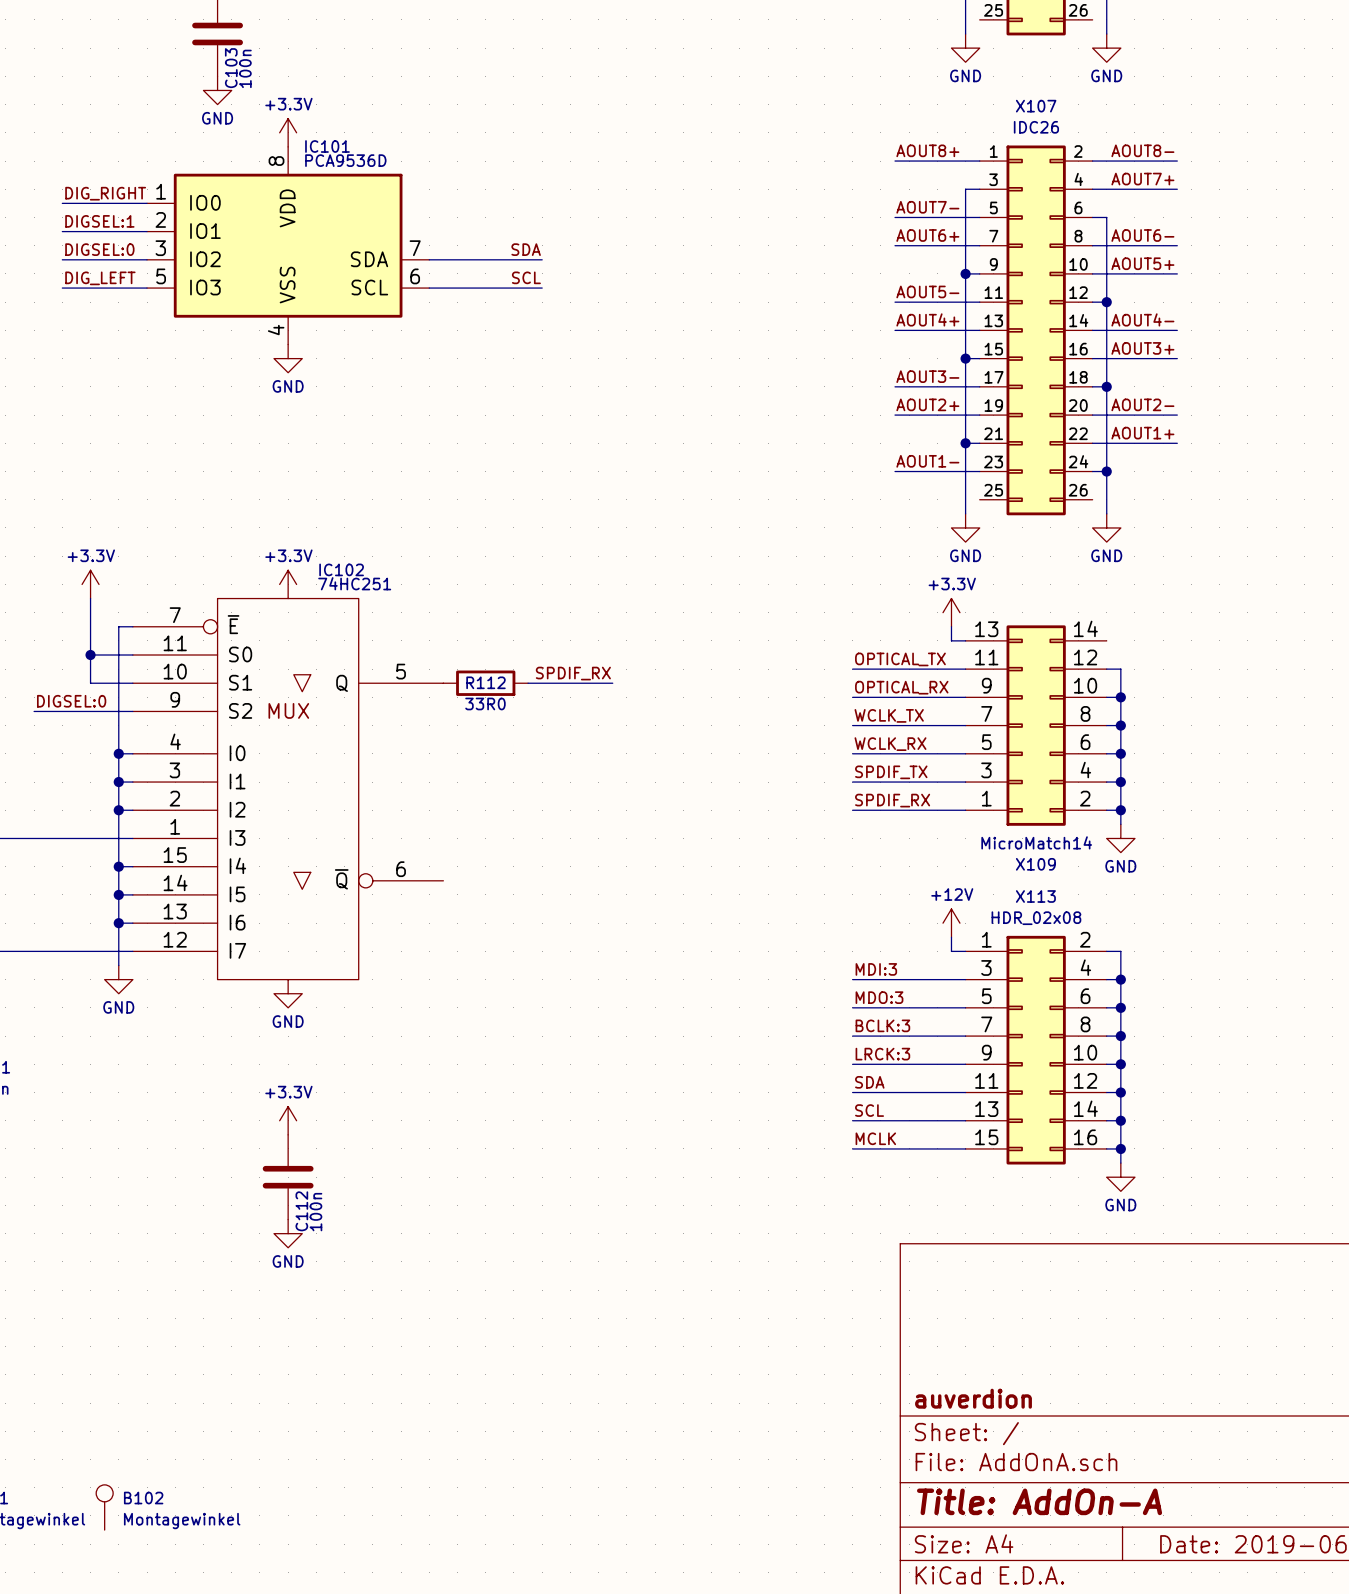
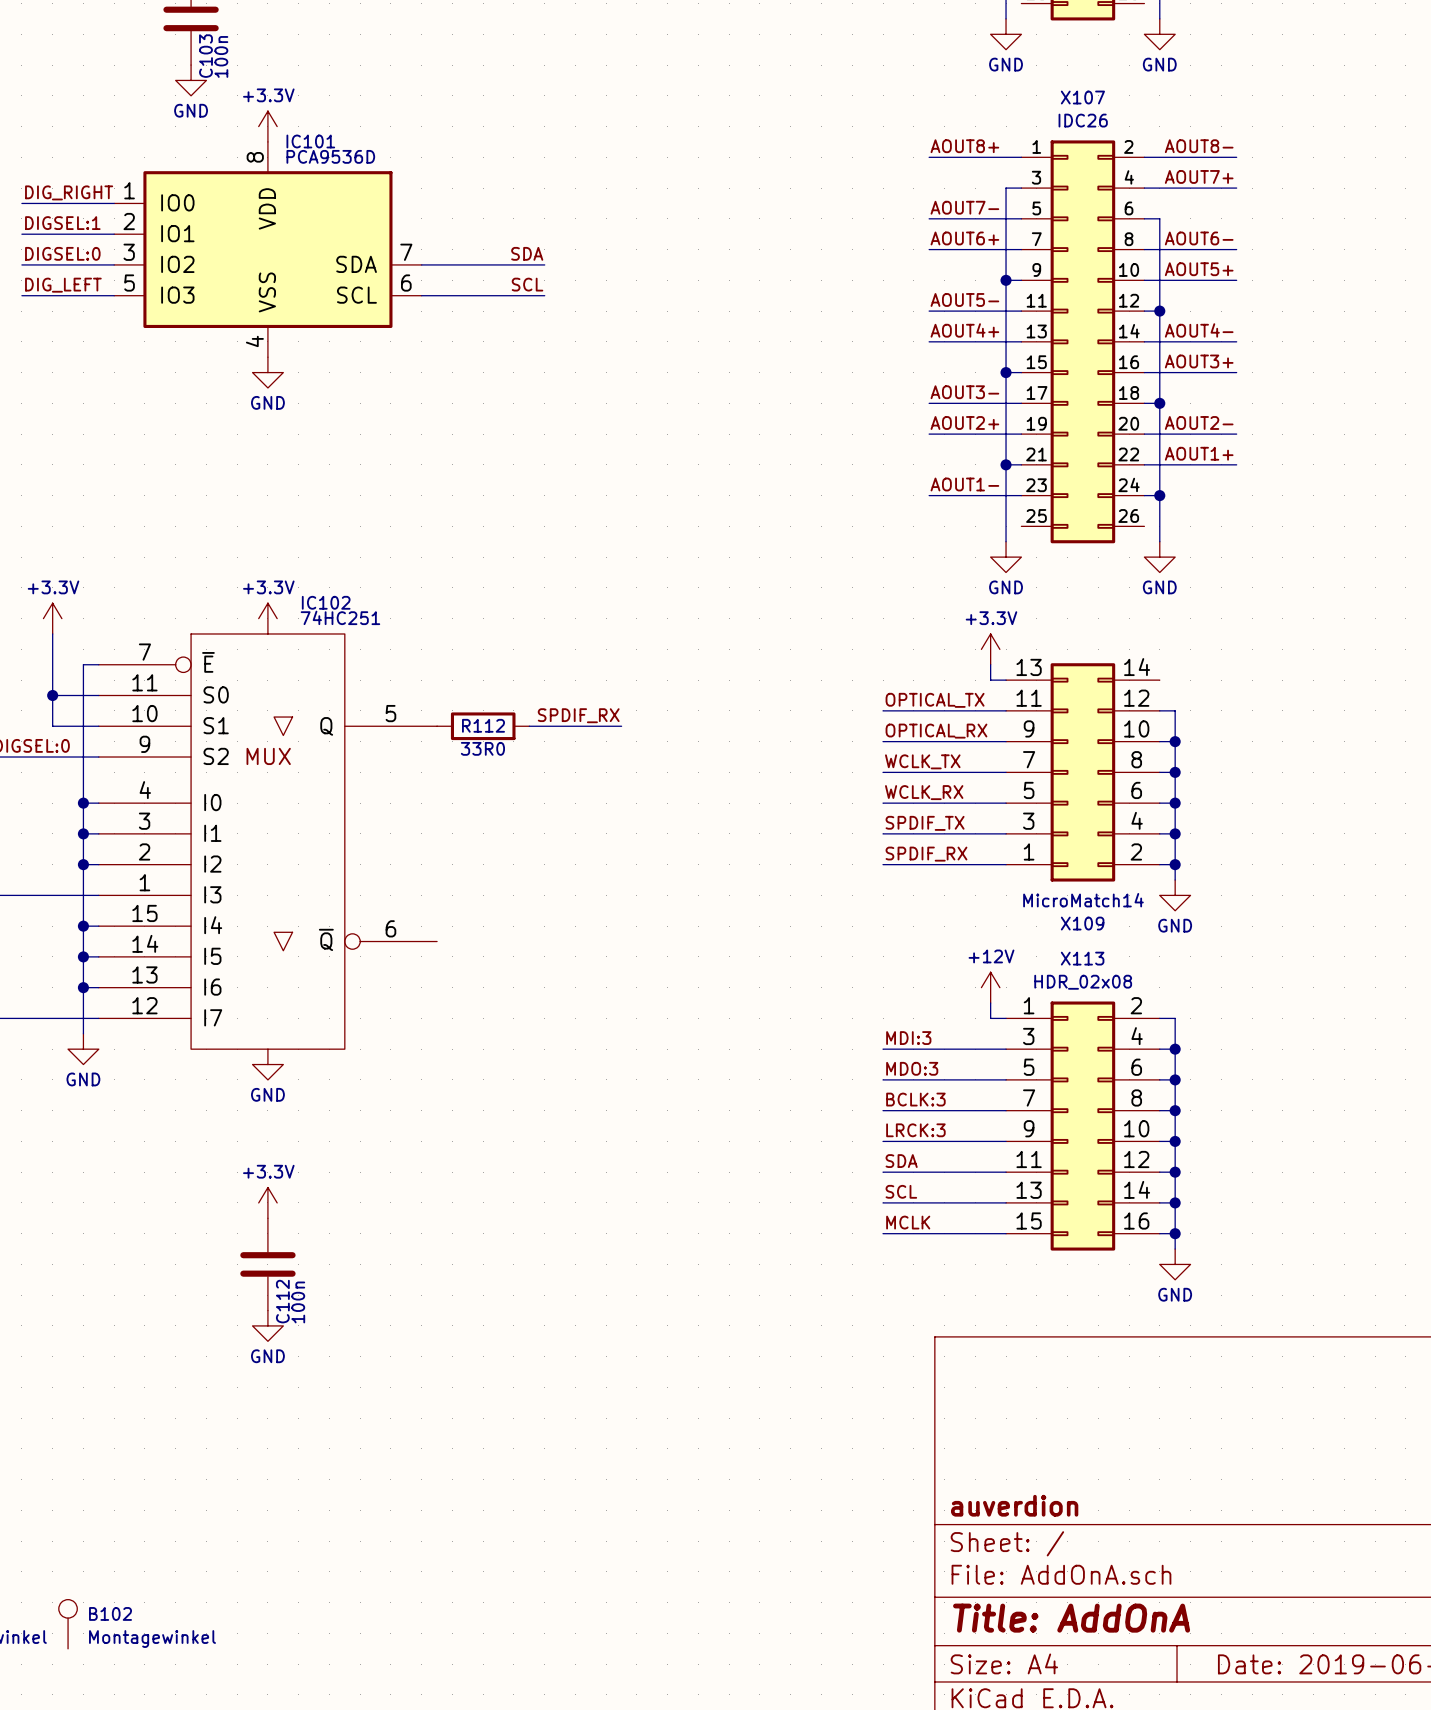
title block: Title: AddOn-A (1039, 1501) -> Title: AddOnA (1071, 1618)

